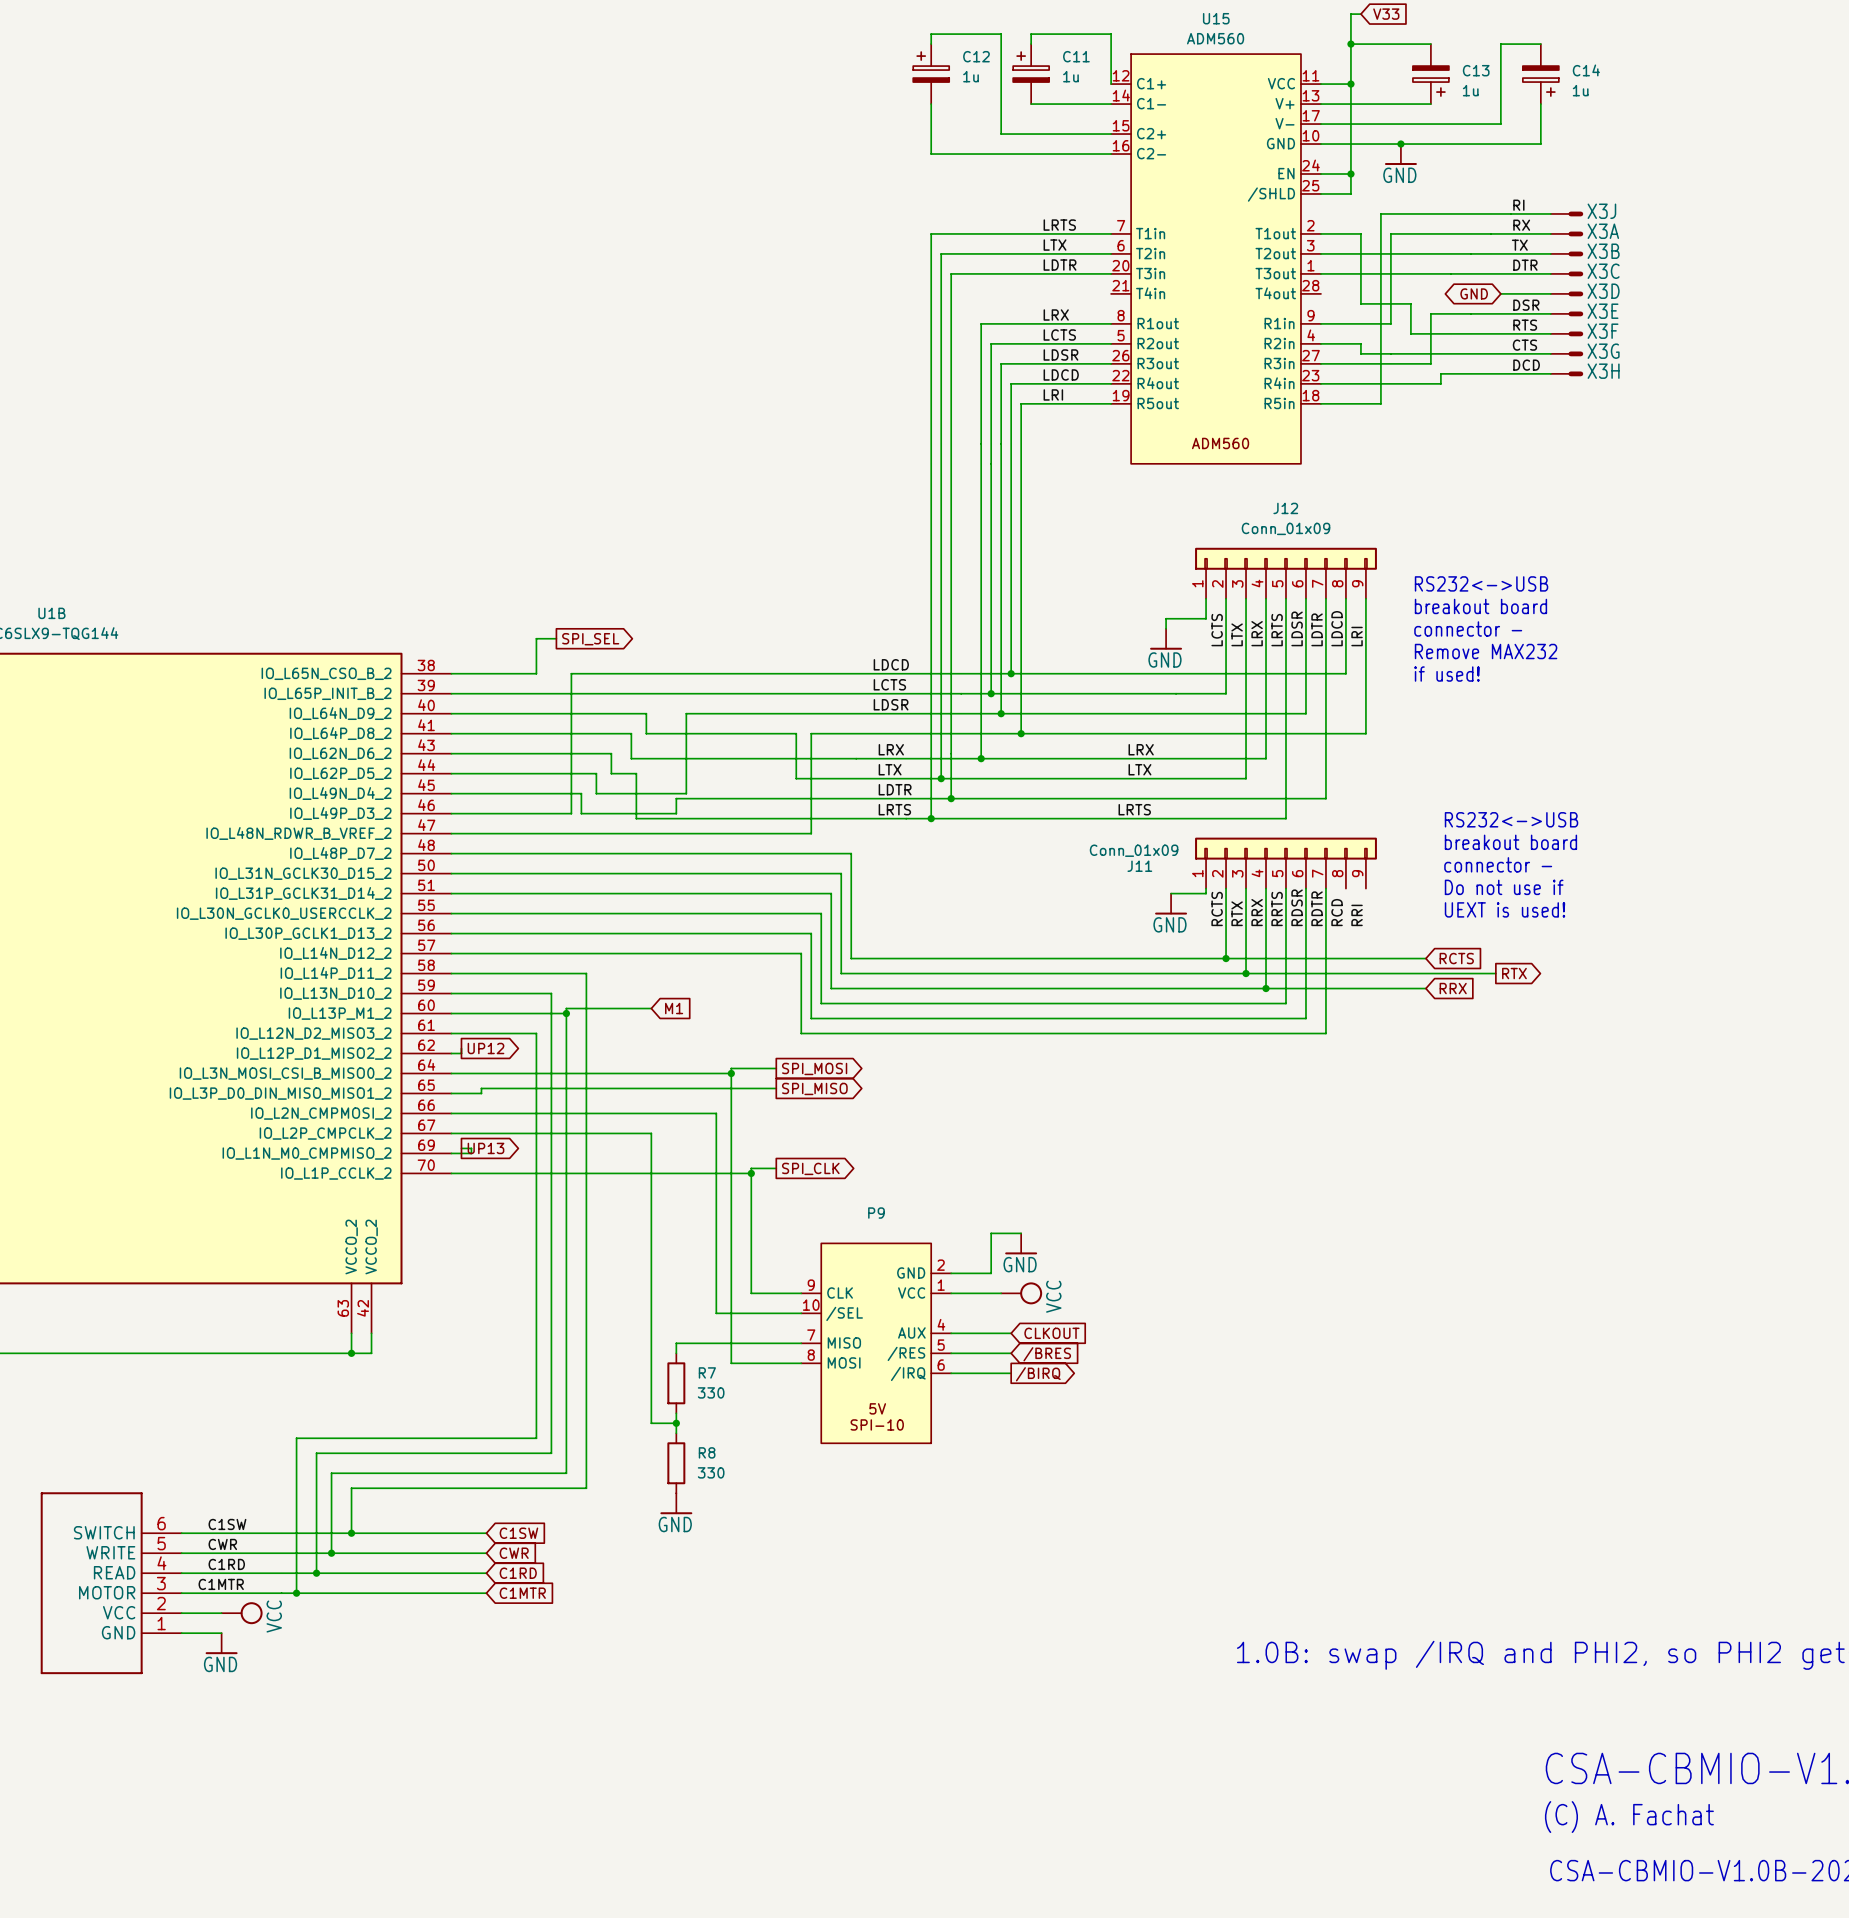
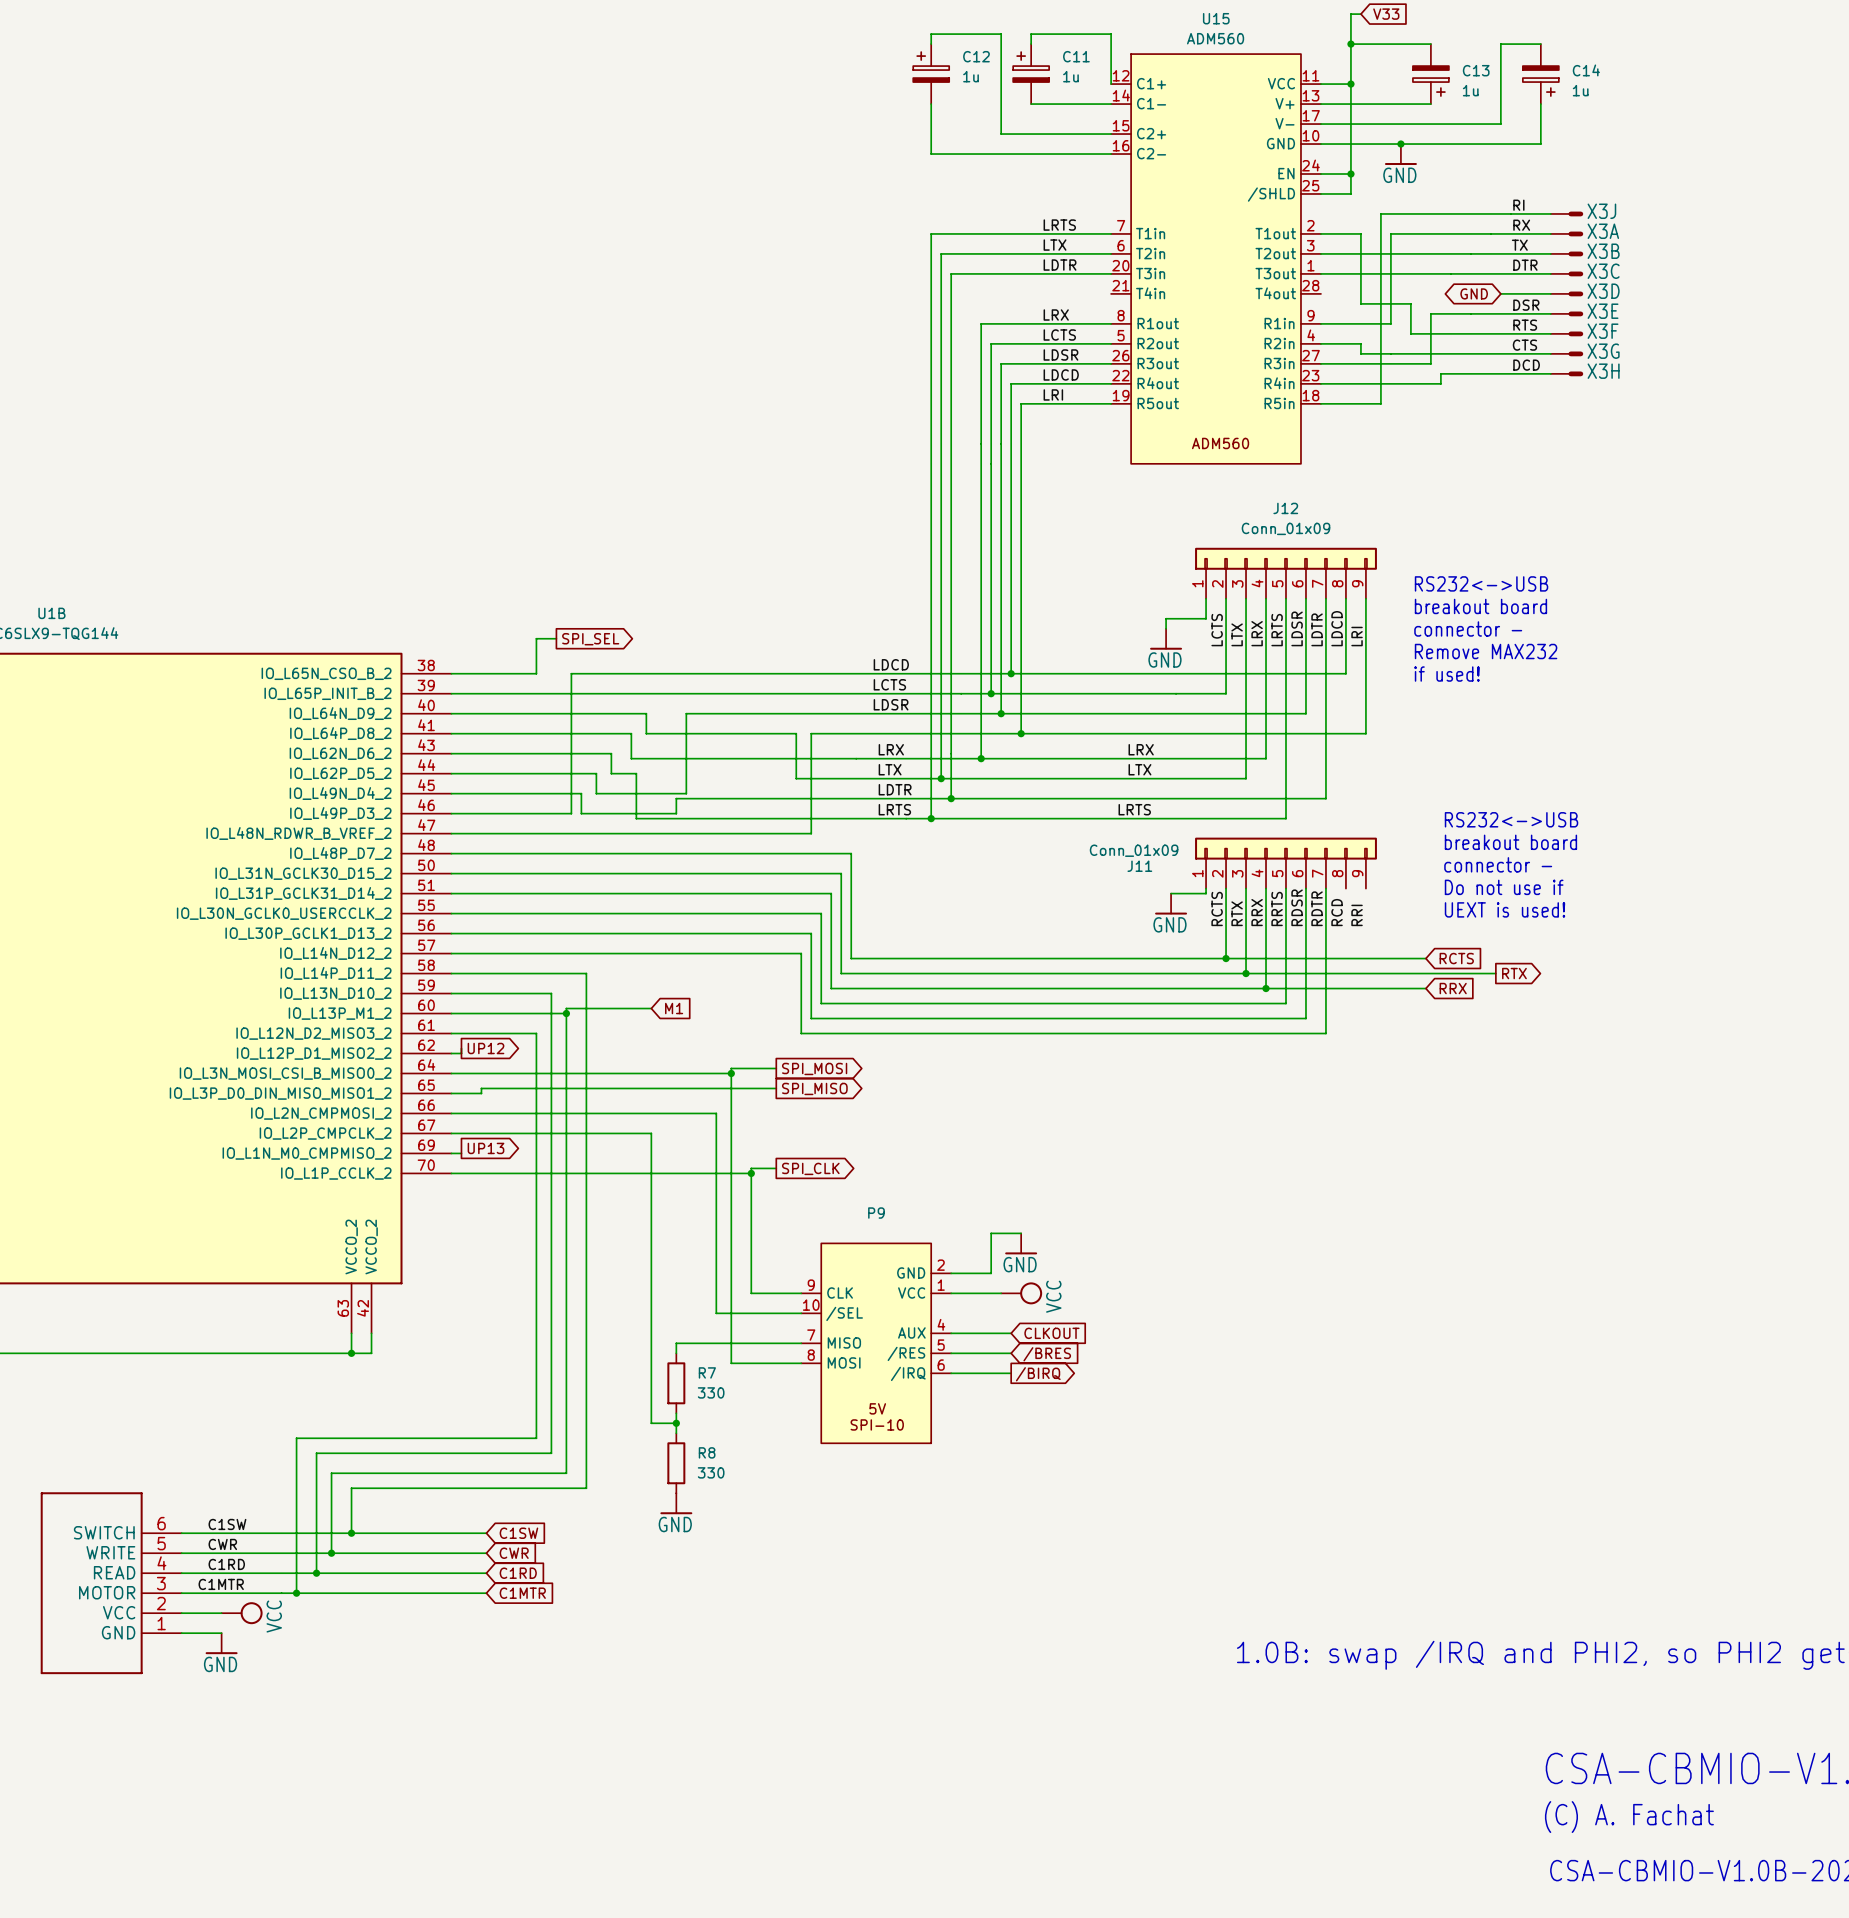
wire: (461, 1148) (471, 1148) (471, 1153) (461, 1153) -> none

